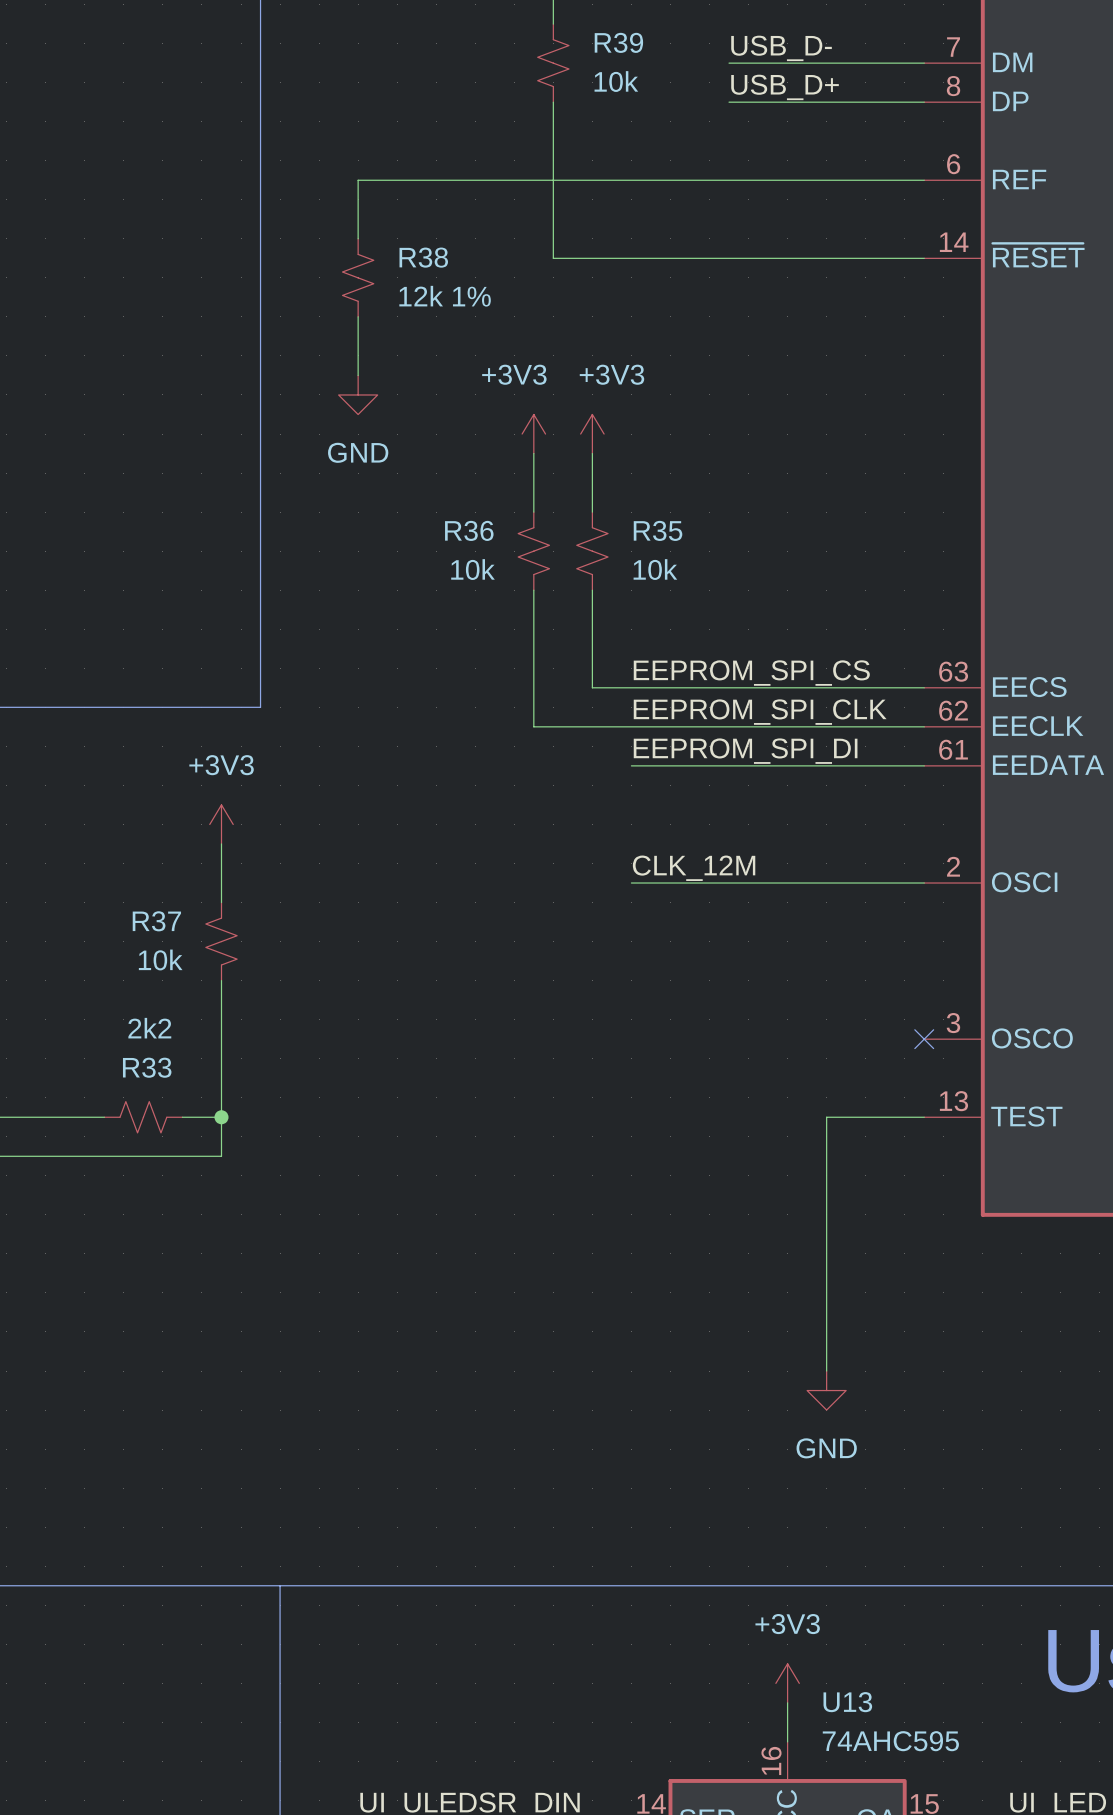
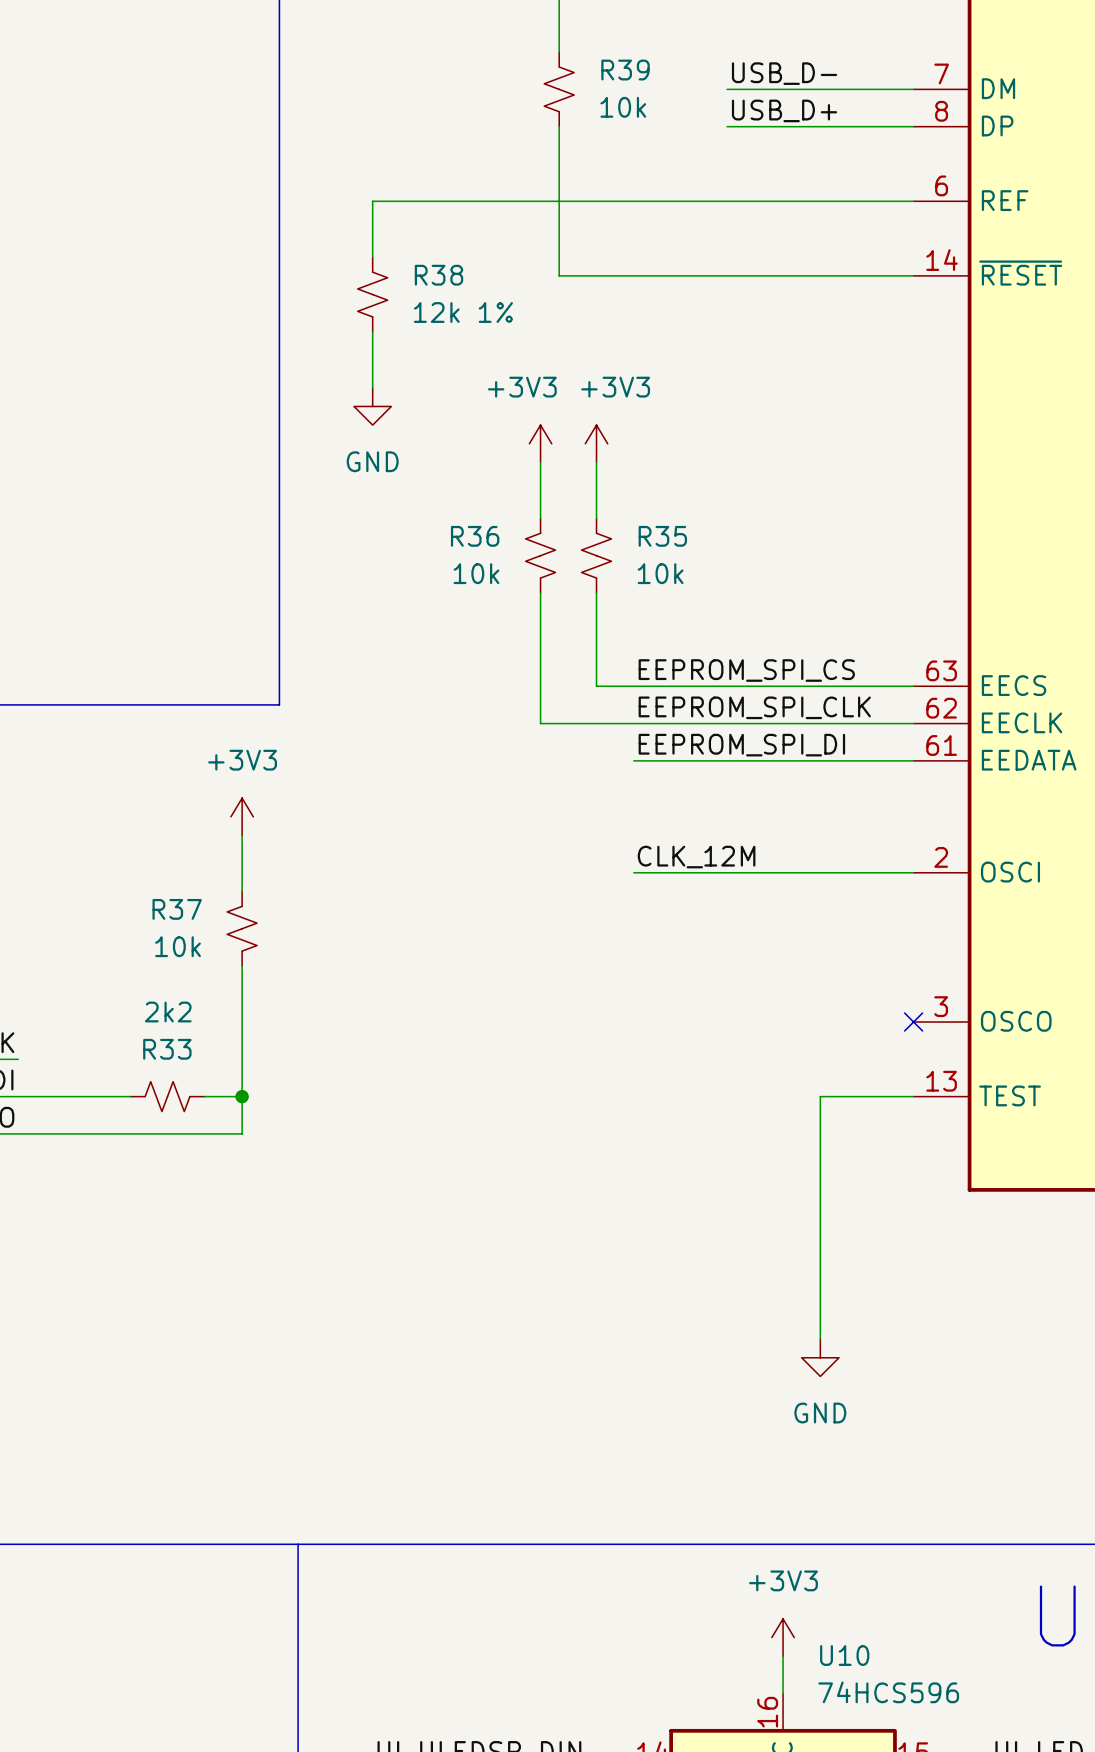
U13 name: U13 (847, 1702) -> U10 (844, 1655)
U13 value: 74AHC595 (890, 1741) -> 74HCS596 (888, 1692)

